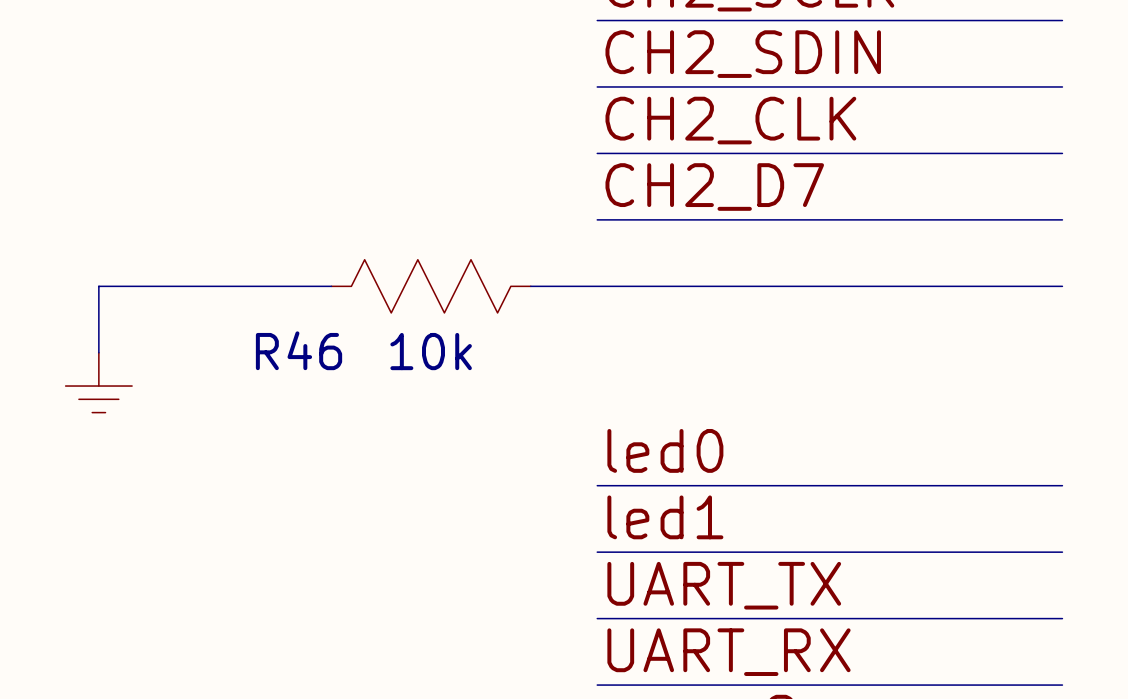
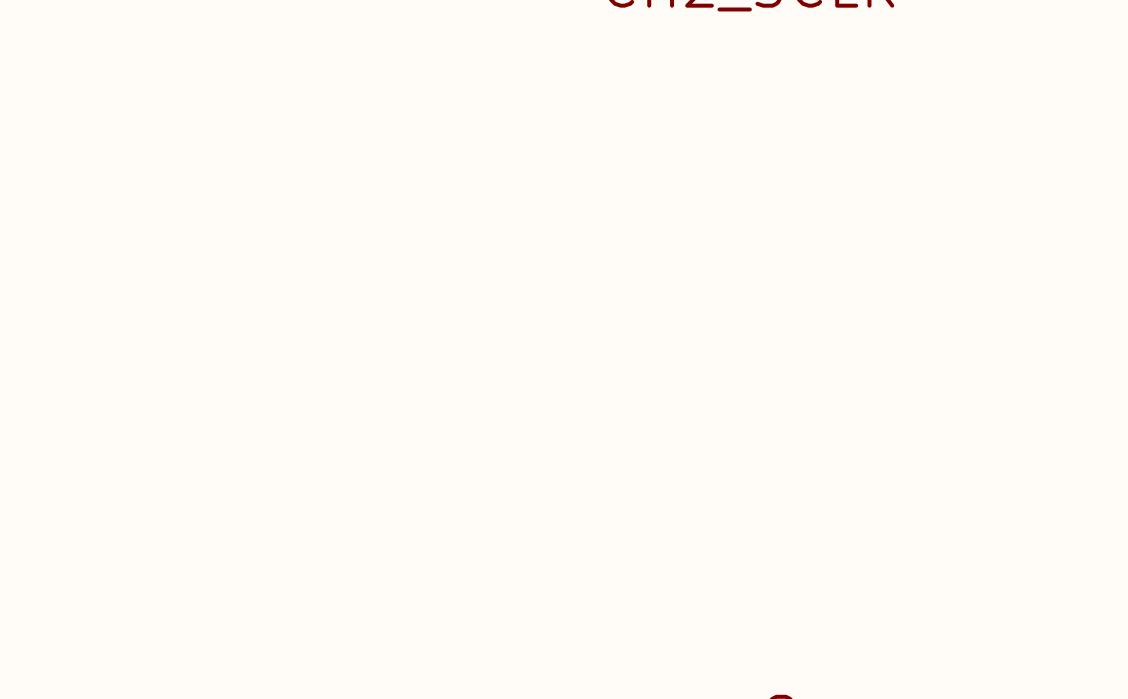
wire: (597, 20) (1062, 20) -> none
label: CH2_SDIN (743, 54) -> none
wire: (597, 86) (1062, 86) -> none
label: CH2_CLK (730, 120) -> none
wire: (597, 153) (1062, 153) -> none
label: CH2_D7 (714, 187) -> none
wire: (597, 219) (1062, 219) -> none
wire: (331, 286) (98, 286) (98, 352) -> none
R46: 10k (431, 286) -> none
wire: (530, 286) (1062, 286) -> none
power symbol: (98, 382) -> none
label: led0 (665, 450) -> none
wire: (597, 485) (1062, 485) -> none
label: led1 (665, 517) -> none
wire: (597, 552) (1062, 552) -> none
label: UART_TX (724, 585) -> none
wire: (597, 618) (1062, 618) -> none
label: UART_RX (728, 652) -> none
wire: (597, 685) (1062, 685) -> none

